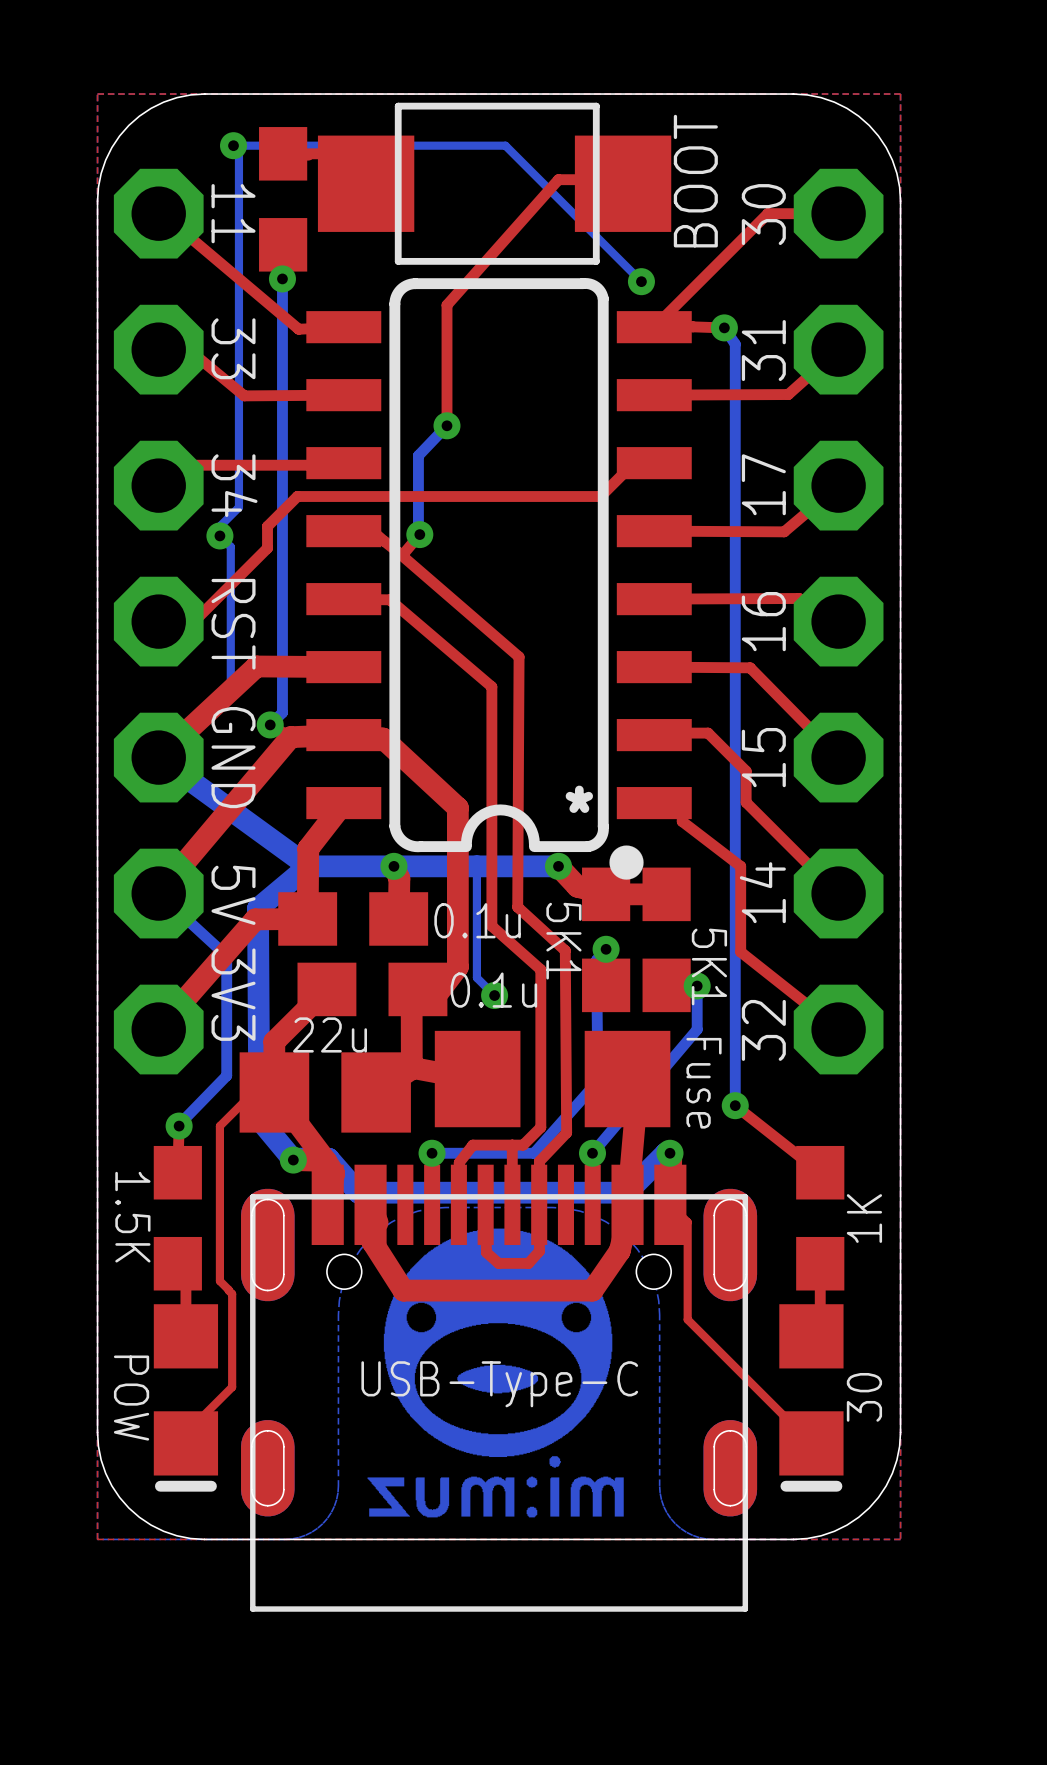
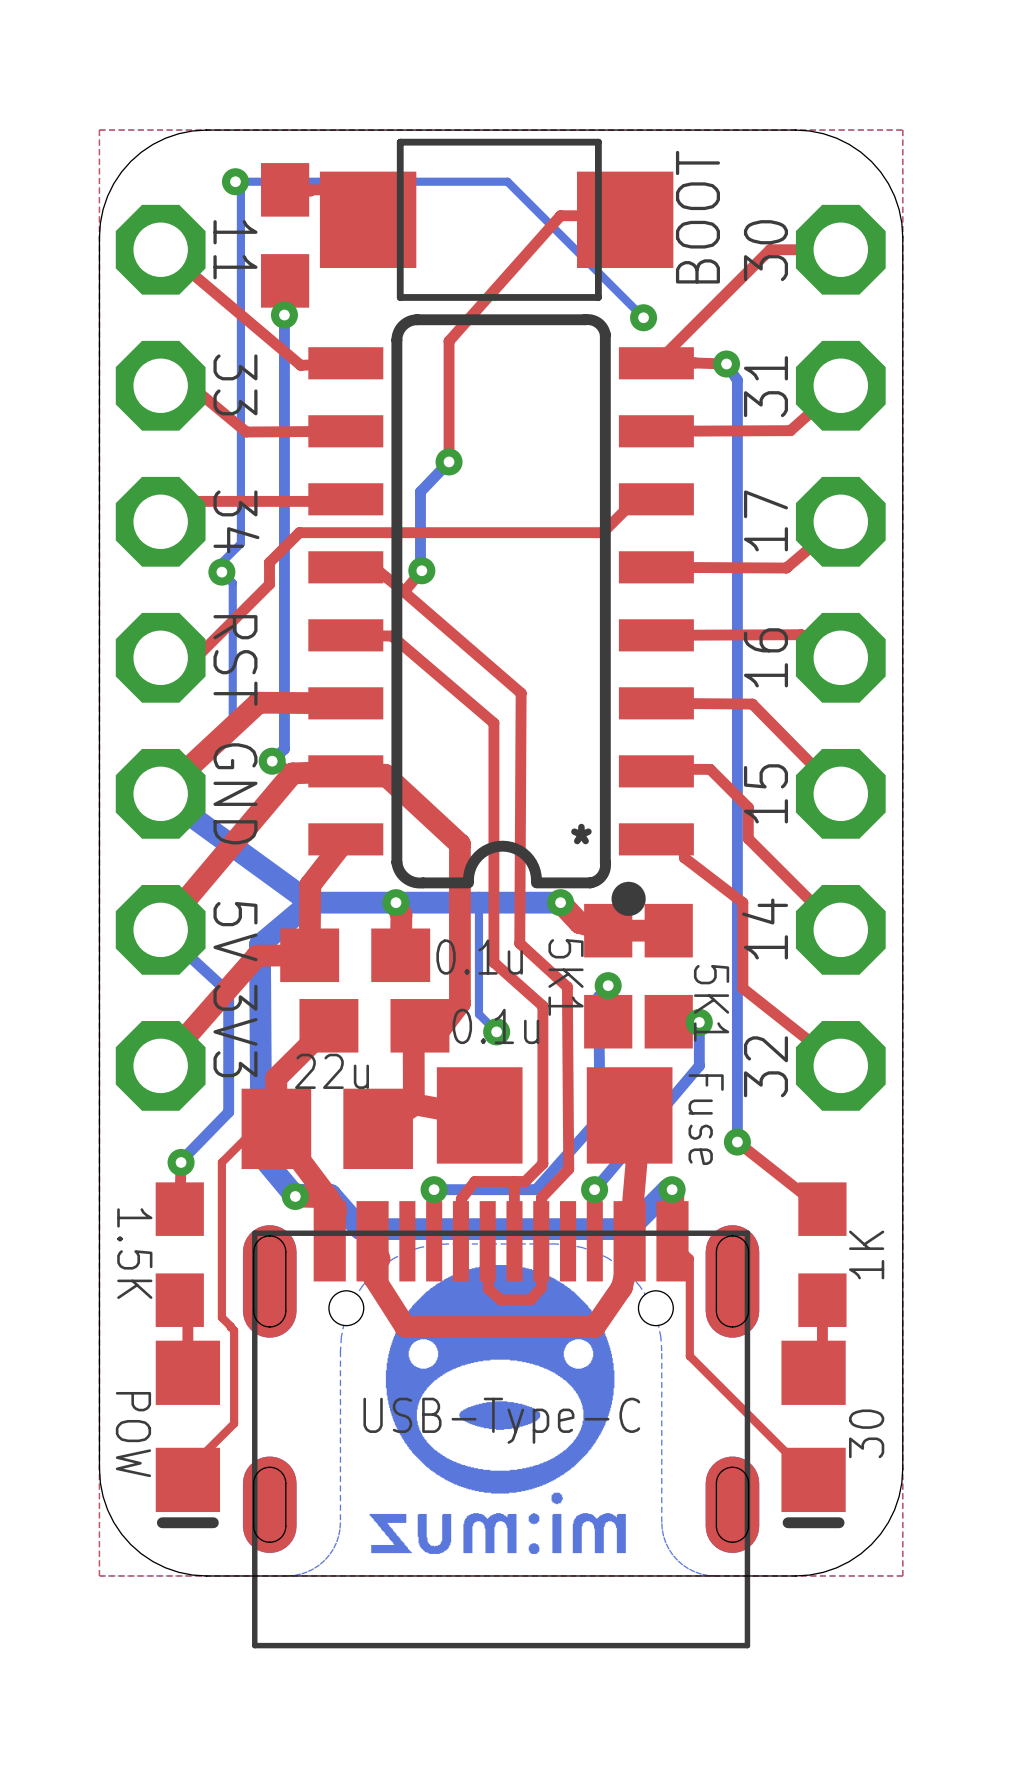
part name: none -> * (581, 834)
text: * (579, 799) -> none

